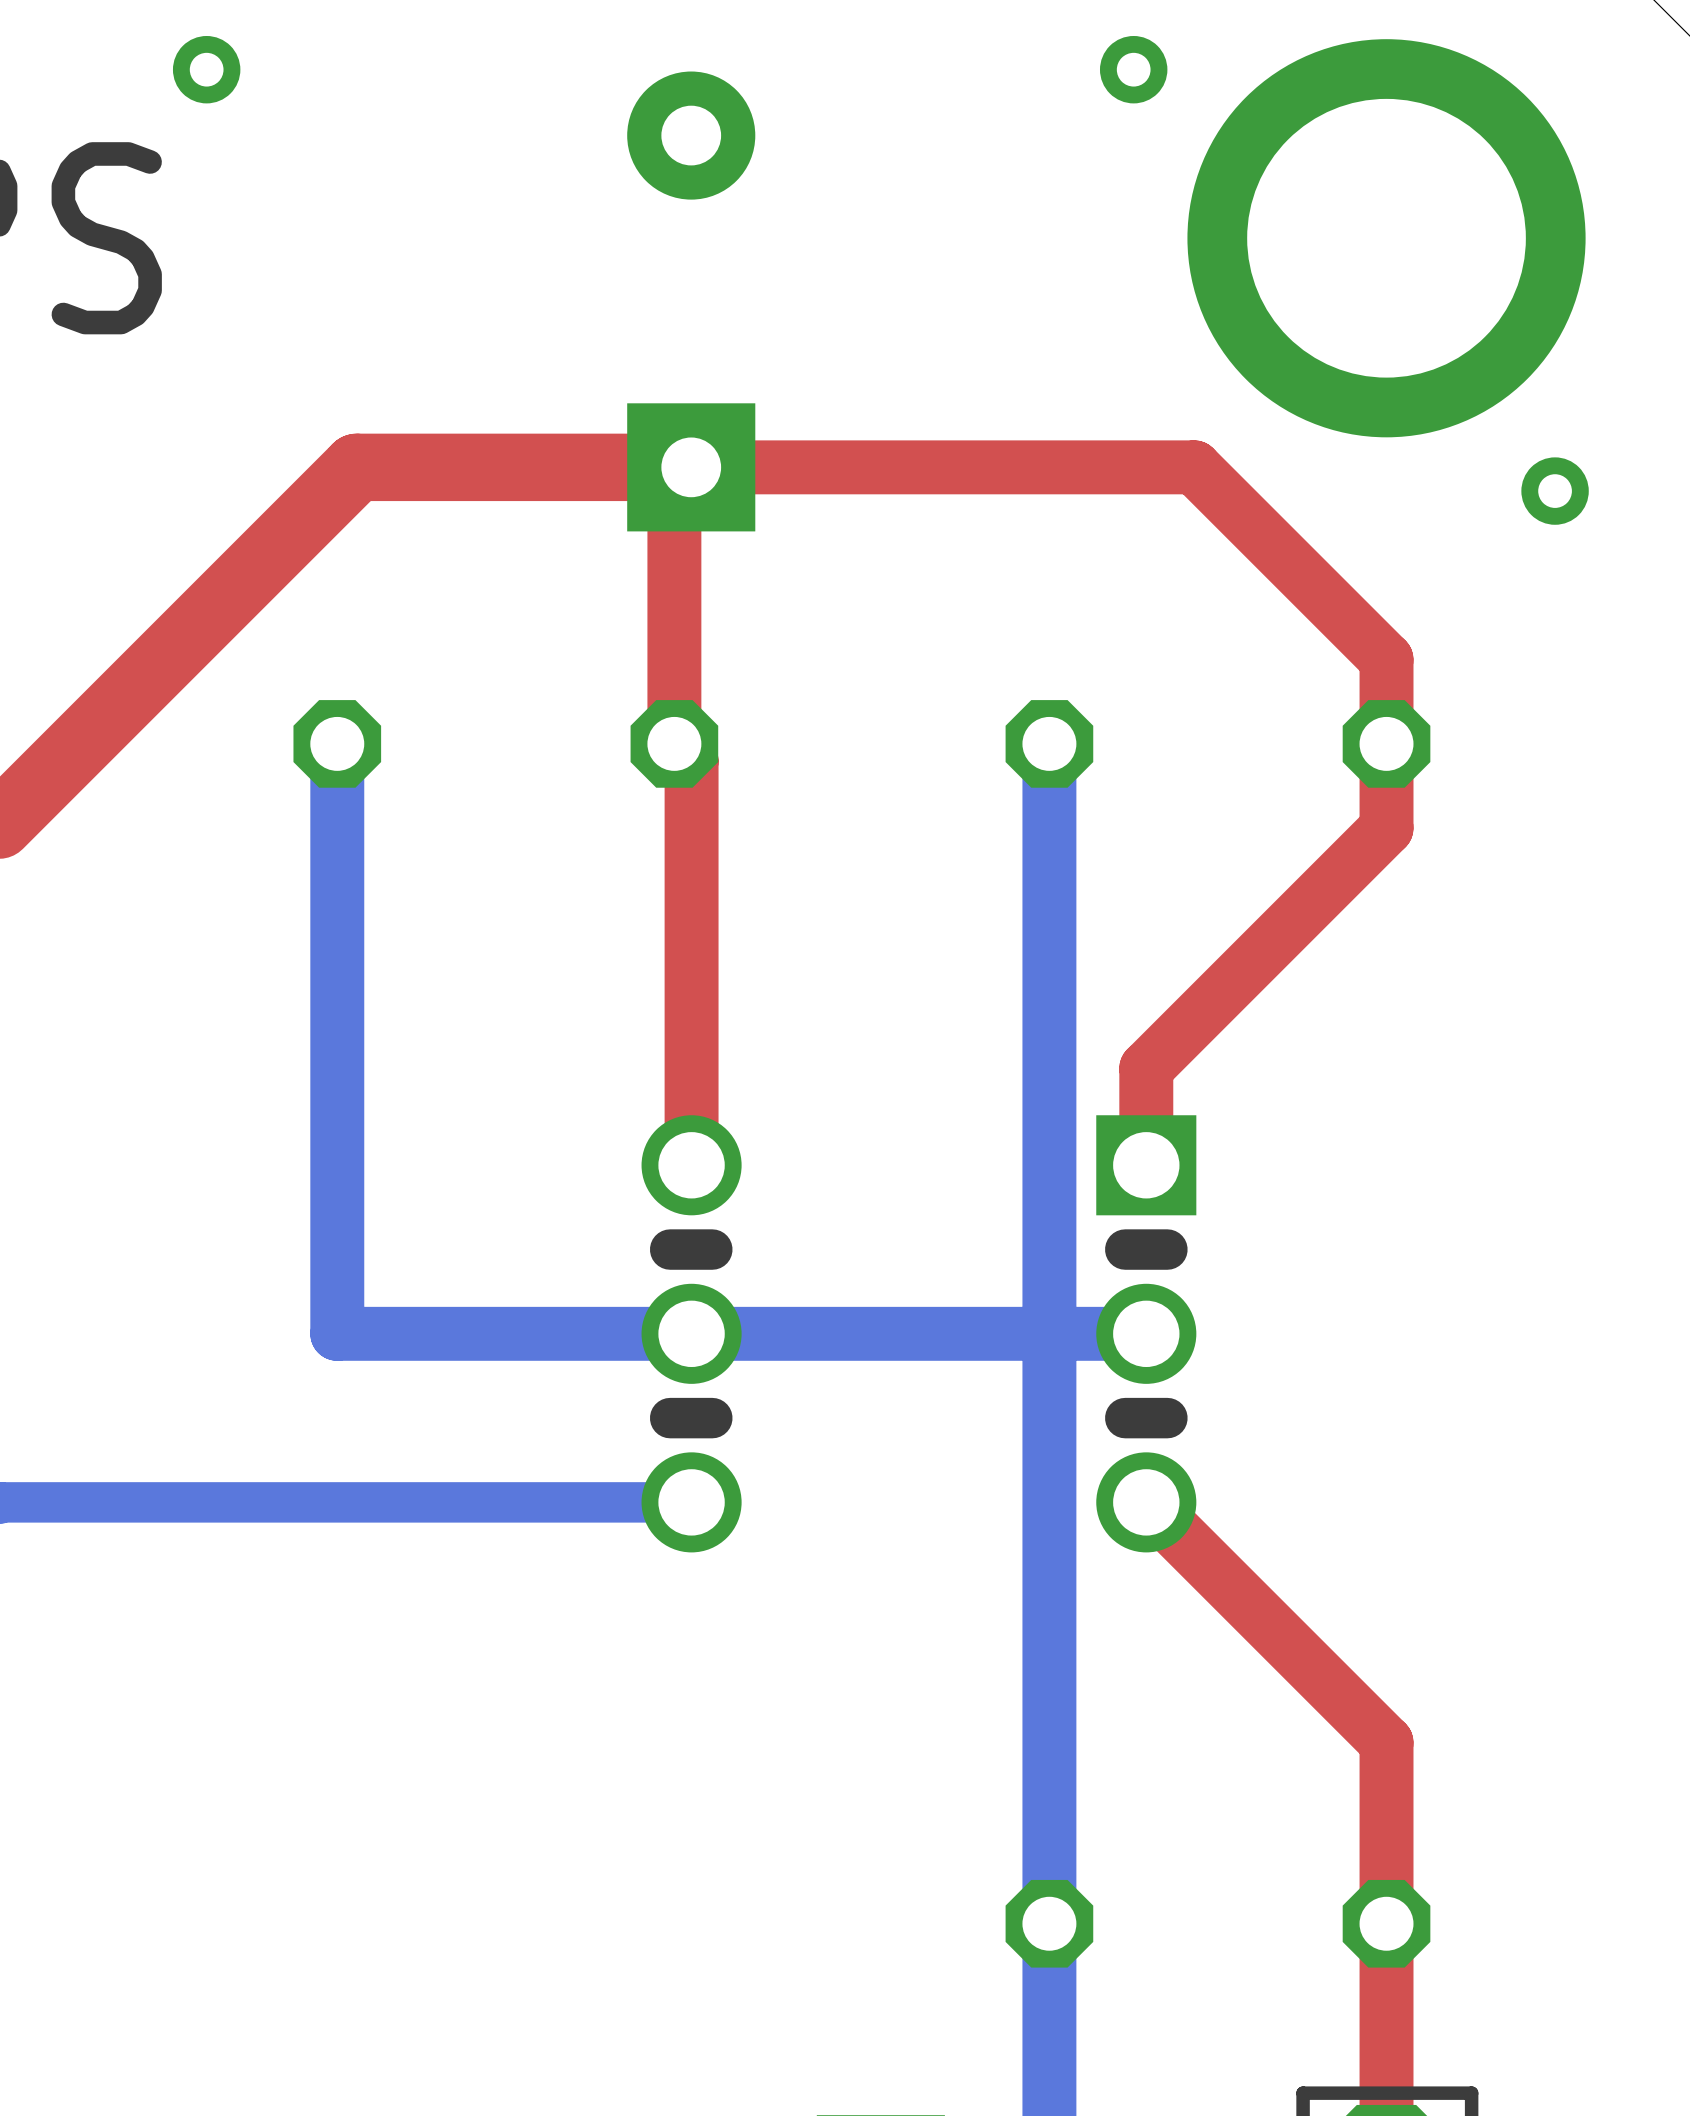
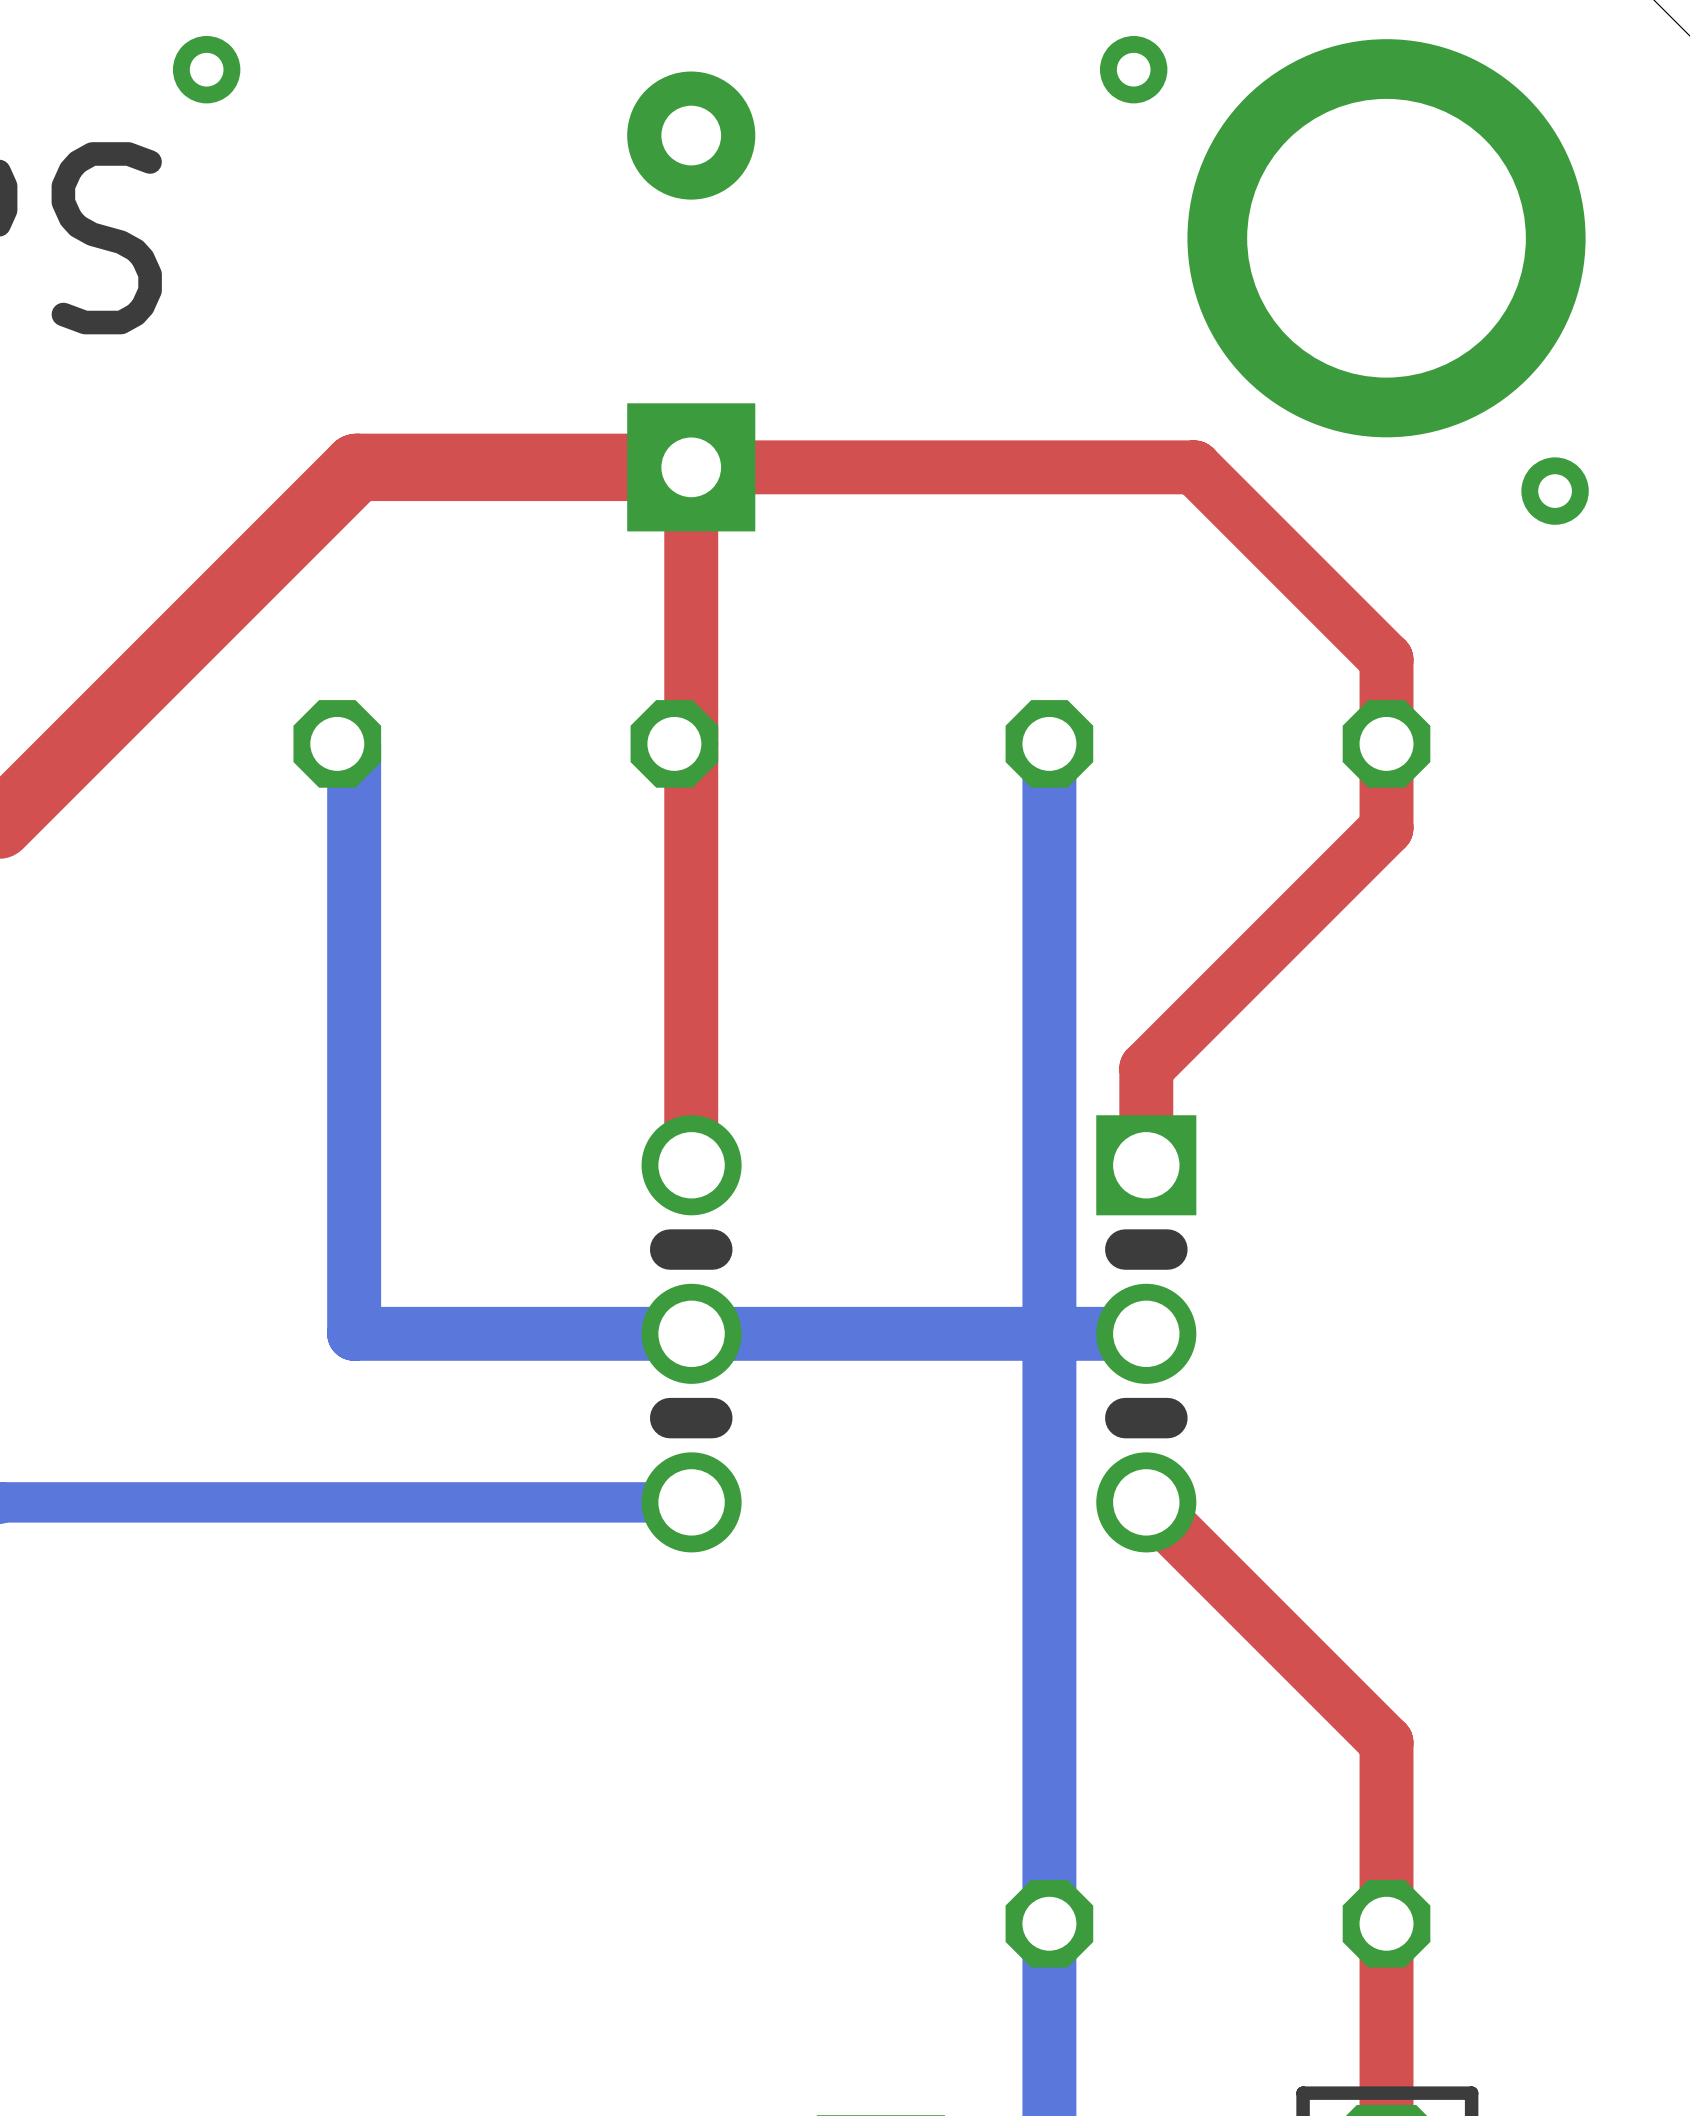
top track: (691, 467) (674, 484) (674, 743) (691, 761) (691, 1165) -> (691, 467) (691, 1165)
bottom track: (337, 743) (337, 1333) (354, 1333) -> (354, 743) (354, 1333)

